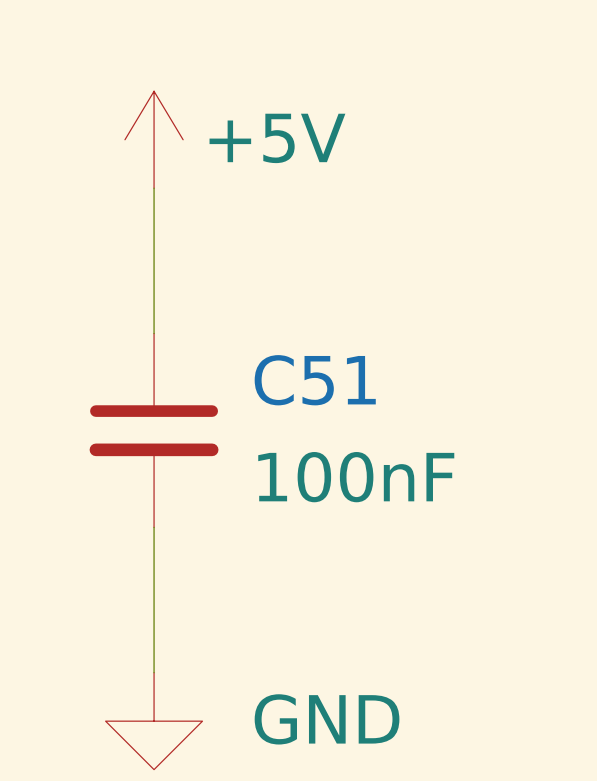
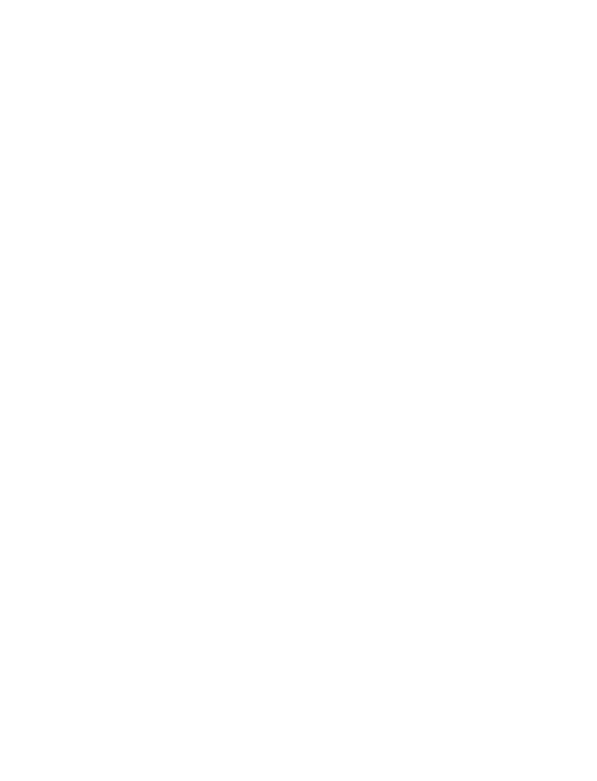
power symbol: +5V (154, 139) -> none
wire: (154, 188) (154, 333) -> none
C51: 100nF (154, 430) -> none
wire: (154, 527) (154, 672) -> none
power symbol: GND (154, 721) -> none

